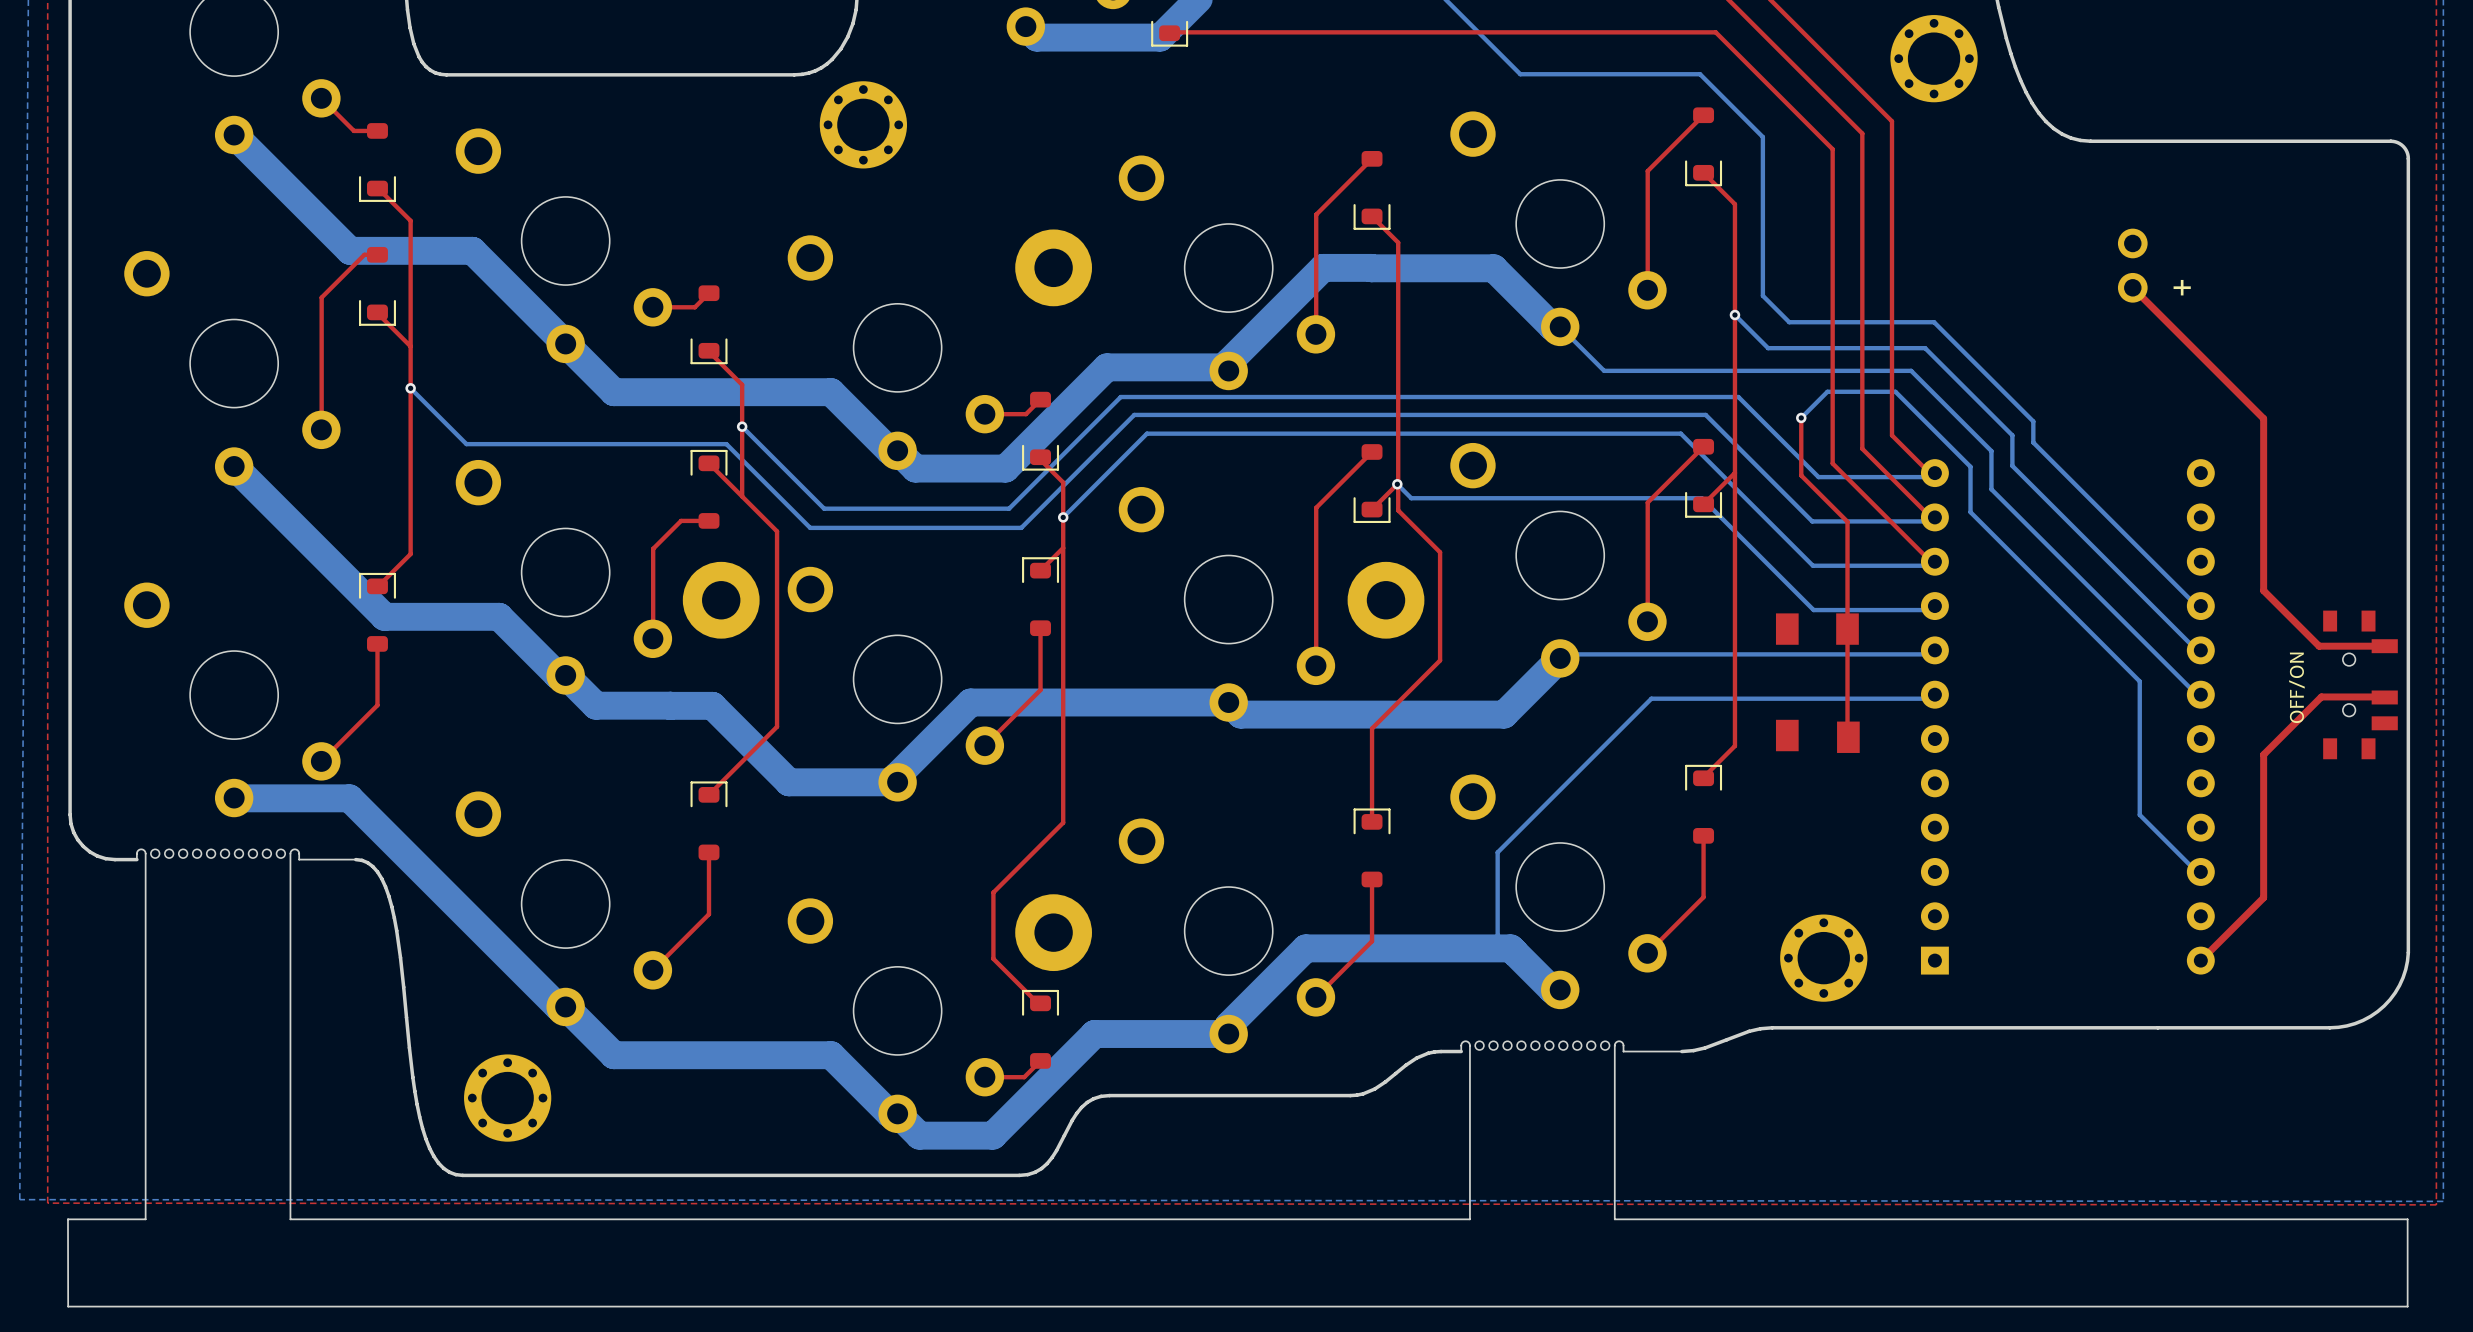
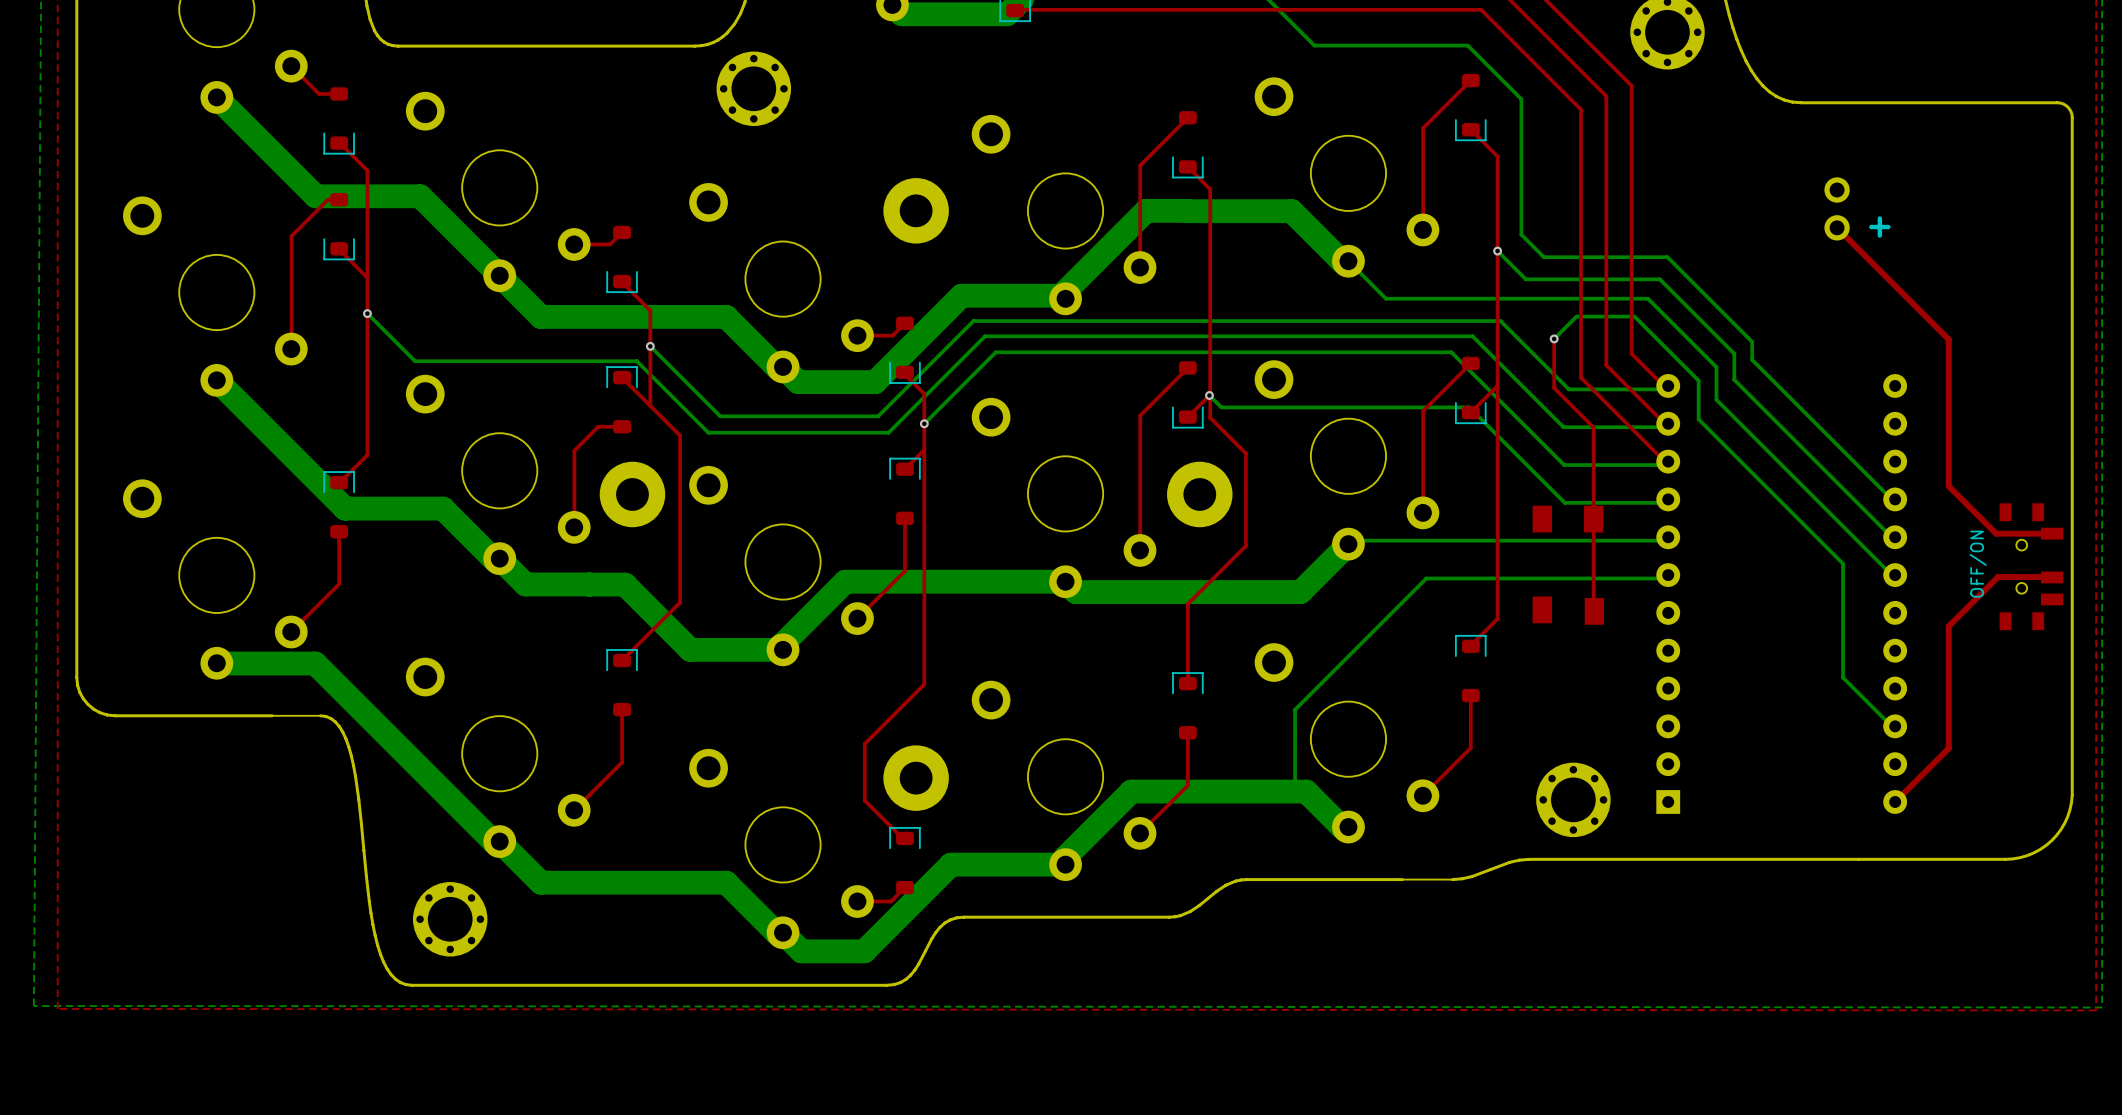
round board edge: [150, 848, 161, 859] -> none
round board edge: [164, 848, 174, 859] -> none
round board edge: [178, 848, 188, 859] -> none
round board edge: [192, 848, 202, 859] -> none
round board edge: [206, 848, 216, 859] -> none
round board edge: [220, 848, 230, 859] -> none
round board edge: [234, 848, 244, 859] -> none
round board edge: [248, 848, 258, 859] -> none
round board edge: [262, 848, 272, 859] -> none
round board edge: [276, 848, 286, 859] -> none
board edge: (136, 859) (137, 851) (143, 850) (145, 853) (145, 1219) (67, 1219) (68, 1306) (2407, 1306) (2407, 1219) (1614, 1219) (1614, 1045) (1616, 1042) (1622, 1042) (1623, 1051) -> (133, 715) (272, 715)
board edge: (299, 859) (298, 851) (292, 850) (290, 853) (290, 1219) (1469, 1219) (1469, 1045) (1468, 1042) (1462, 1042) (1461, 1051) -> (1402, 879) (1263, 879)
round board edge: [1474, 1040, 1485, 1051] -> none
round board edge: [1488, 1040, 1499, 1051] -> none
round board edge: [1502, 1040, 1513, 1051] -> none
round board edge: [1516, 1040, 1527, 1051] -> none
round board edge: [1530, 1040, 1541, 1051] -> none
round board edge: [1544, 1040, 1555, 1051] -> none
round board edge: [1558, 1040, 1569, 1051] -> none
round board edge: [1572, 1040, 1583, 1051] -> none
round board edge: [1586, 1040, 1597, 1051] -> none
round board edge: [1600, 1040, 1610, 1051] -> none

